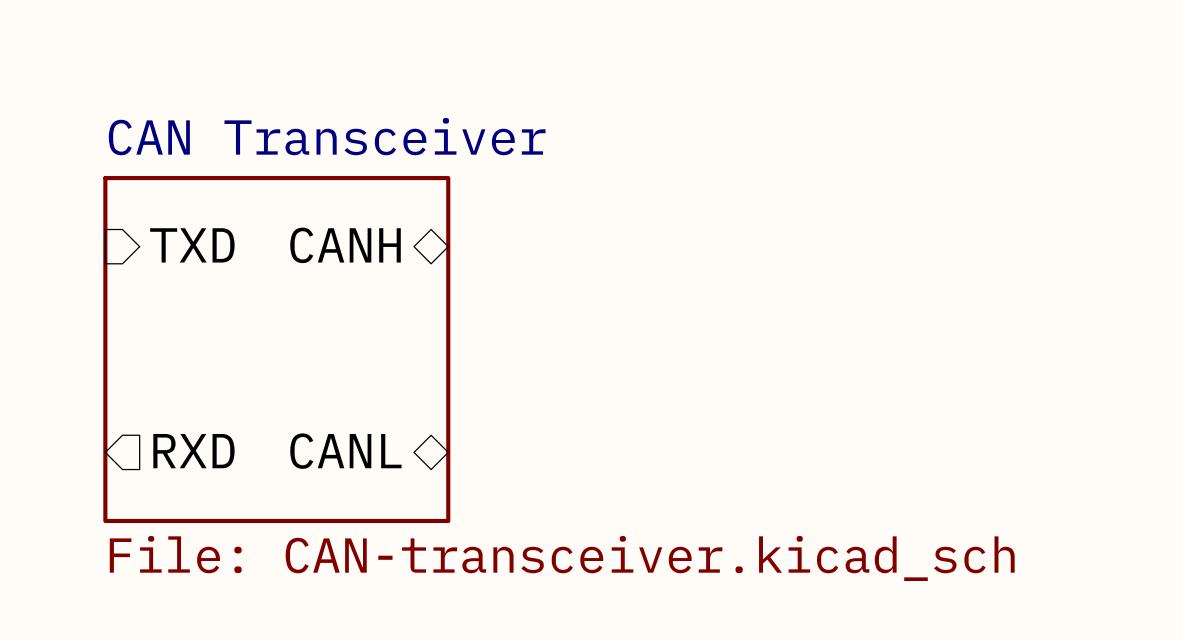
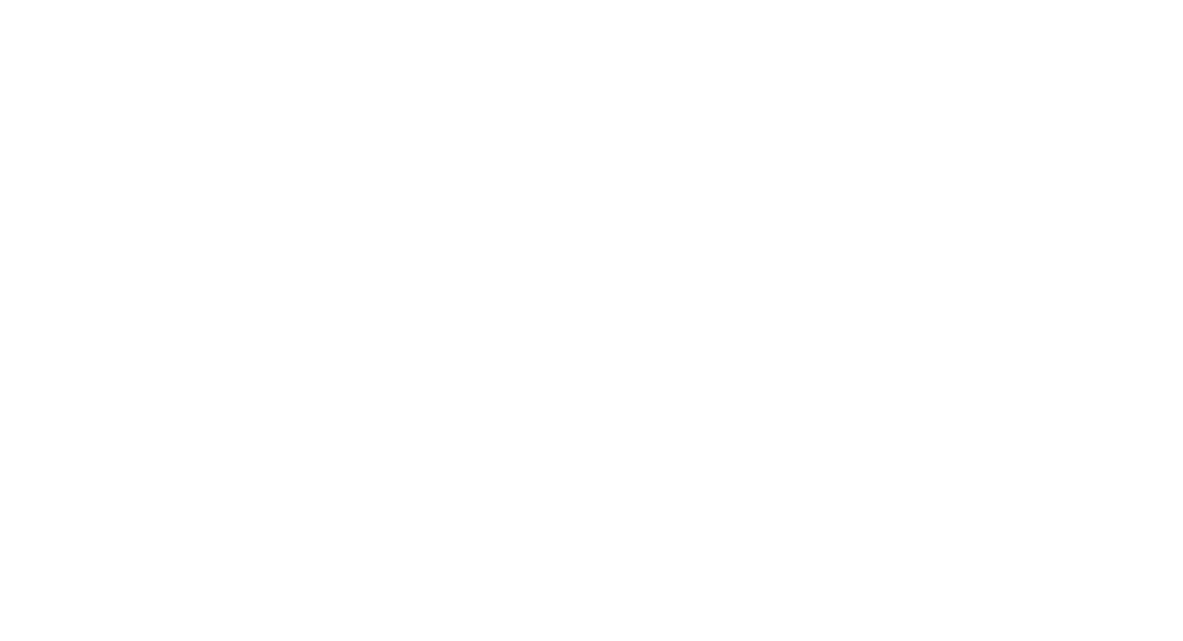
sheet pin: TXD (192, 245) -> none
sheet pin: CANH (345, 245) -> none
sheet CAN Transceiver: File: CAN-transceiver.kicad_sch (276, 349) -> none
sheet pin: RXD (193, 451) -> none
sheet pin: CANL (345, 451) -> none

